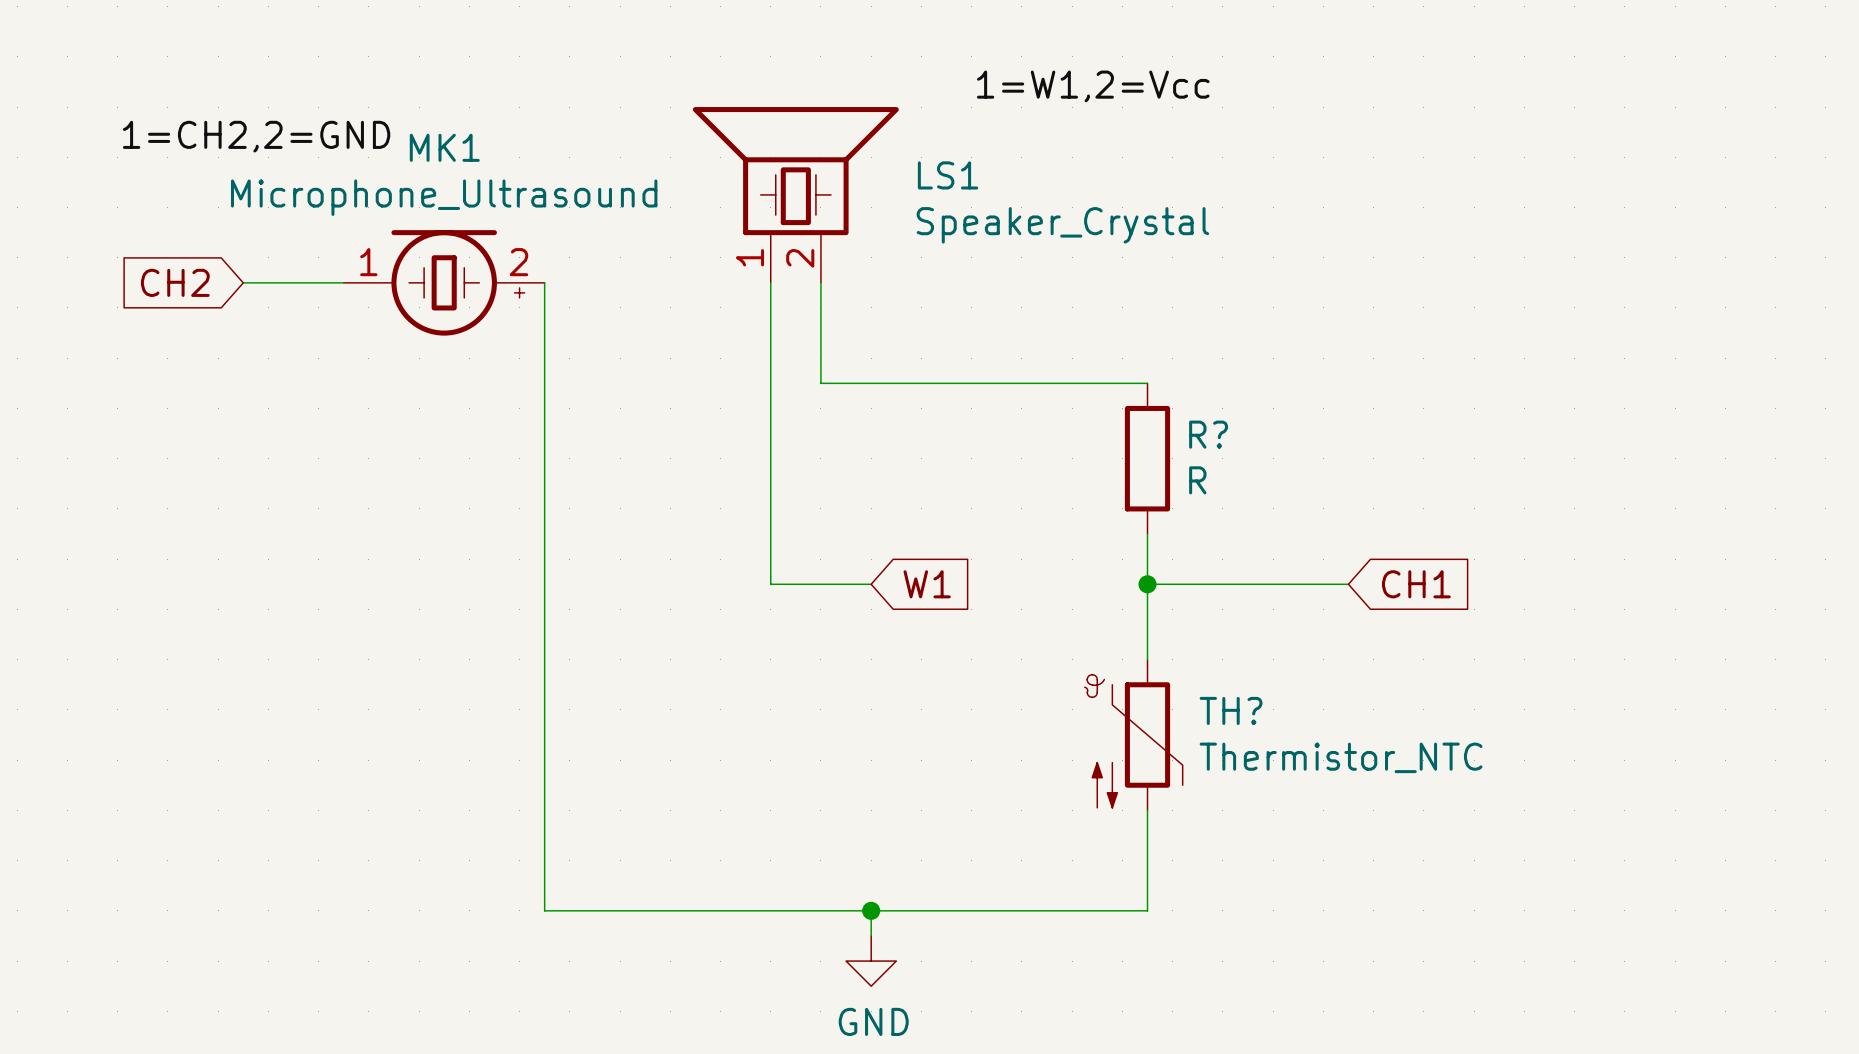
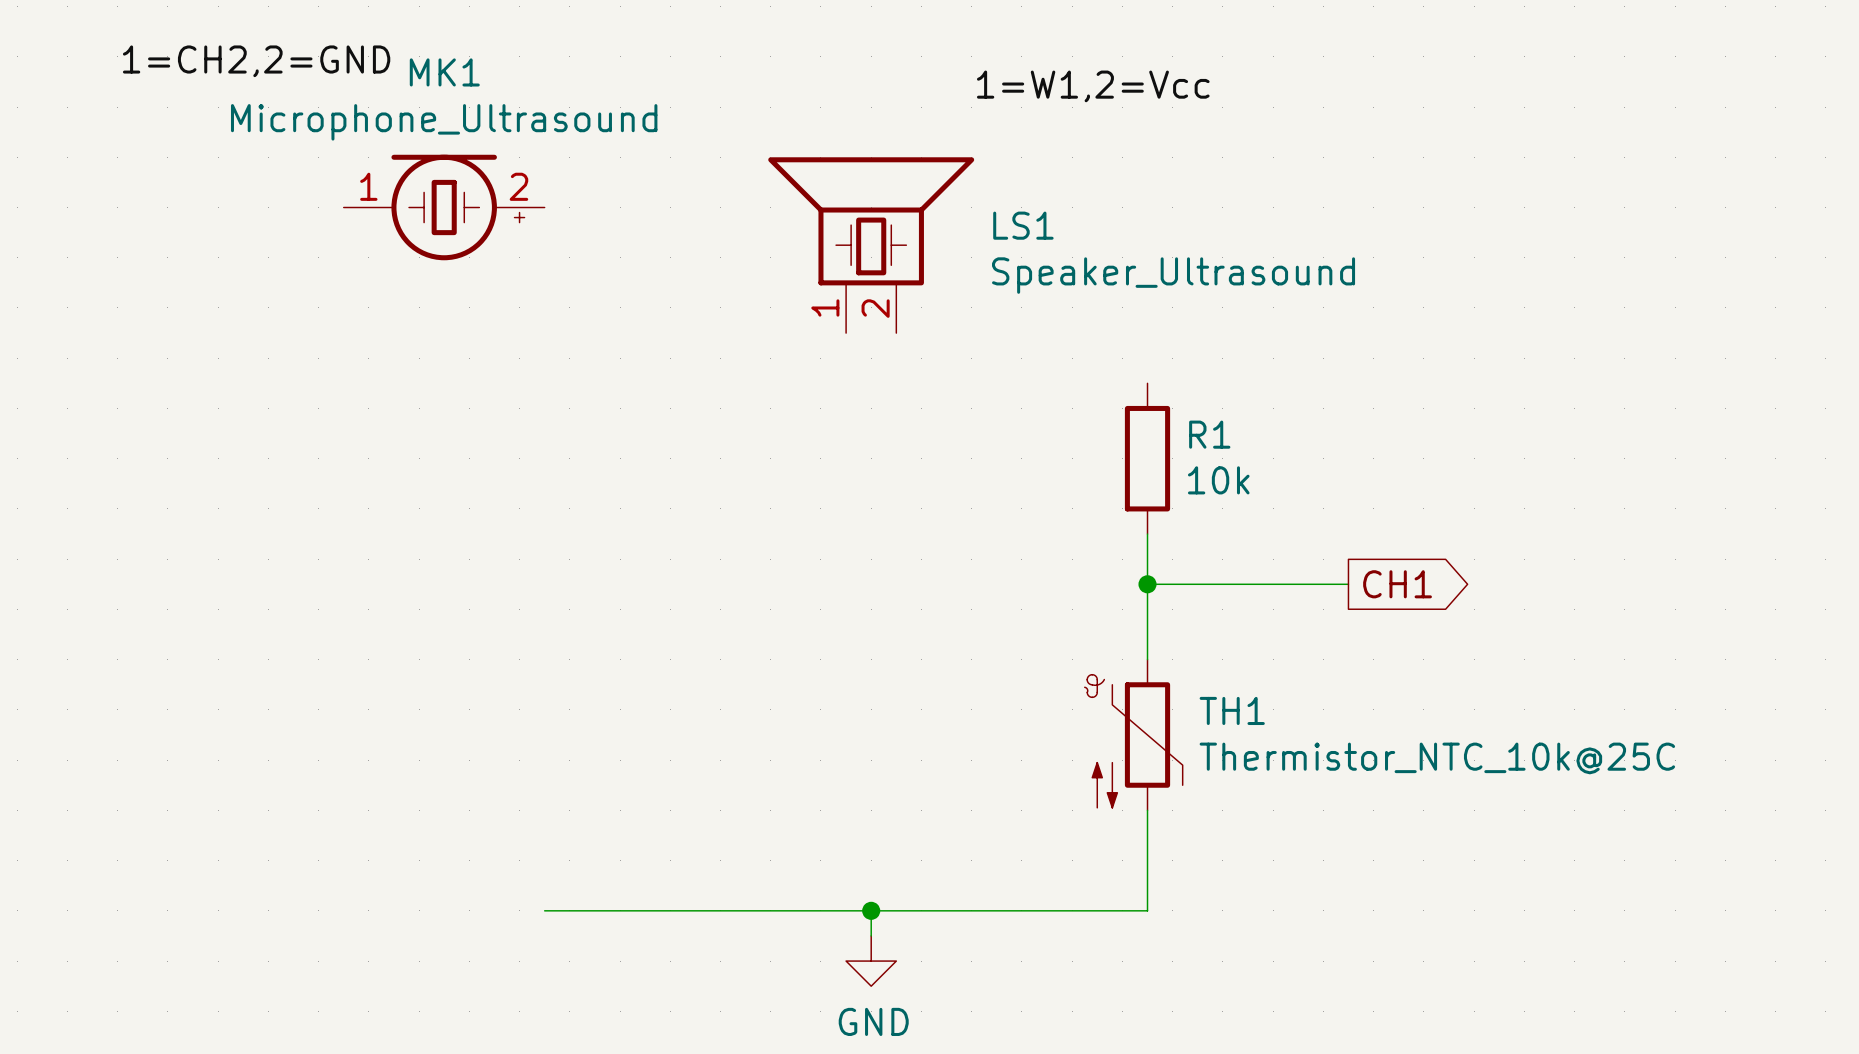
label position: 1=CH2,2=GND (256, 136) -> 1=CH2,2=GND (256, 61)
LS1 position: (795, 194) -> (871, 245)
LS1 value: Speaker_Crystal (1062, 225) -> Speaker_Ultrasound (1173, 275)
global label: CH2 (175, 282) -> none
wire: (243, 282) (343, 282) -> none
MK1 position: (444, 282) -> (444, 207)
wire: (544, 282) (544, 910) -> none
wire: (770, 282) (770, 584) (871, 584) -> none
wire: (820, 282) (820, 383) (1147, 383) -> none
R? name: R? (1208, 434) -> R1 (1209, 434)
R? value: R (1197, 480) -> 10k (1218, 480)
global label: W1 (927, 584) -> none
global label shape: input (1416, 584) -> output (1397, 584)
TH? name: TH? (1231, 710) -> TH1 (1232, 710)
TH? value: Thermistor_NTC (1341, 757) -> Thermistor_NTC_10k@25C (1437, 758)

